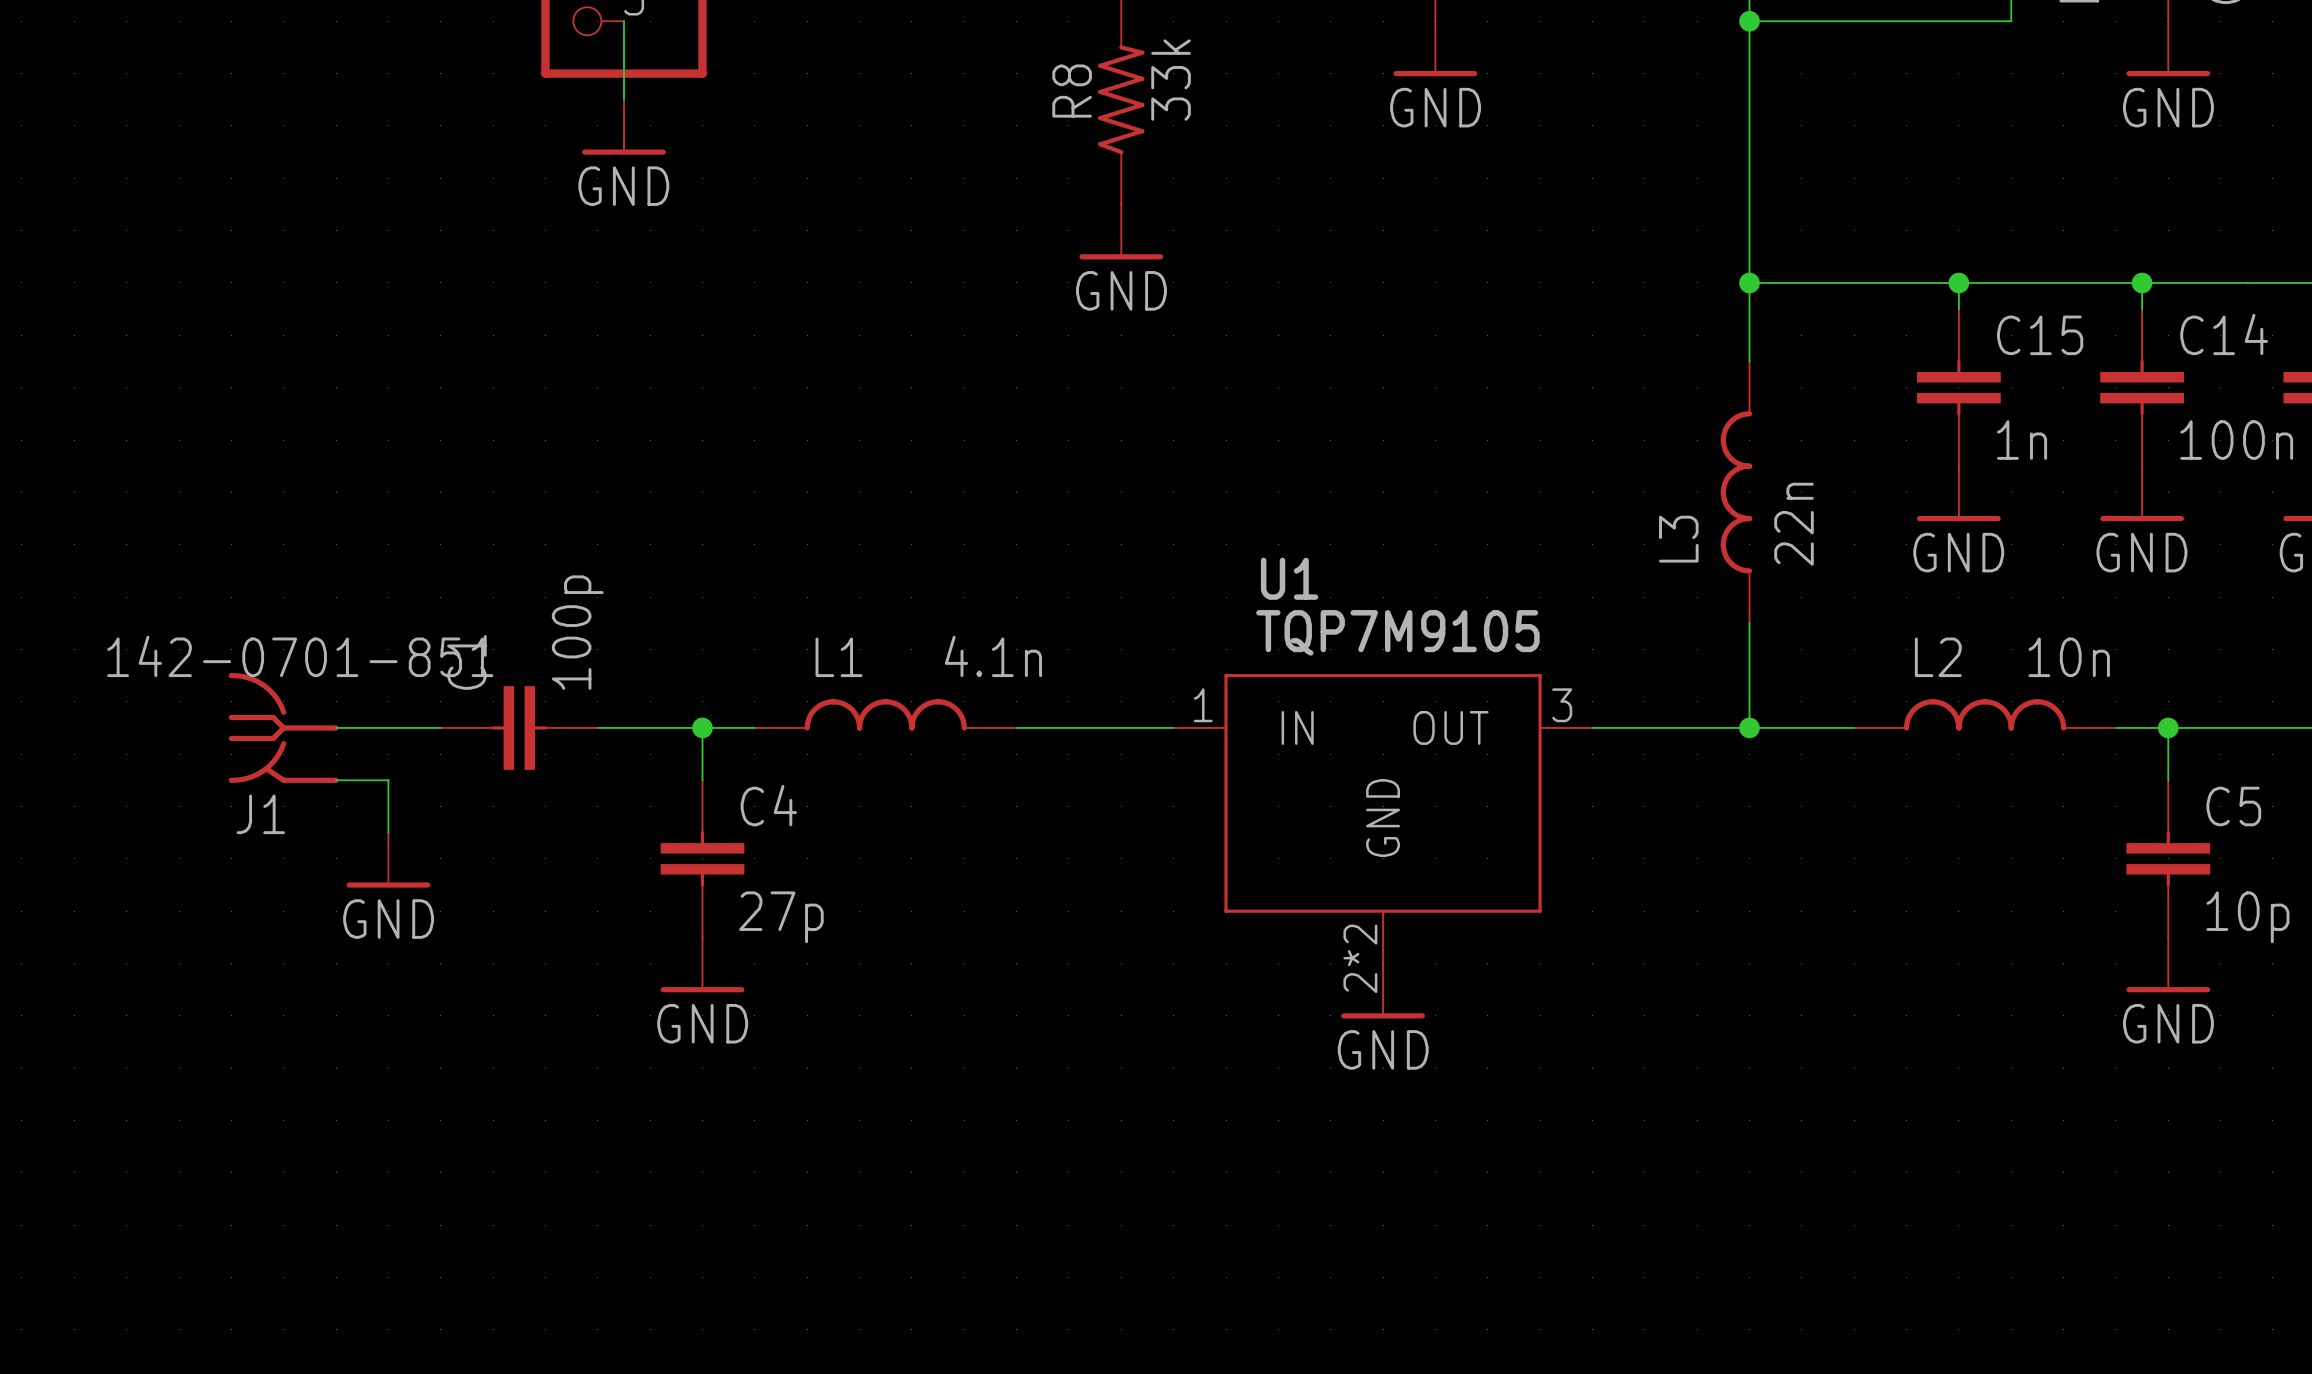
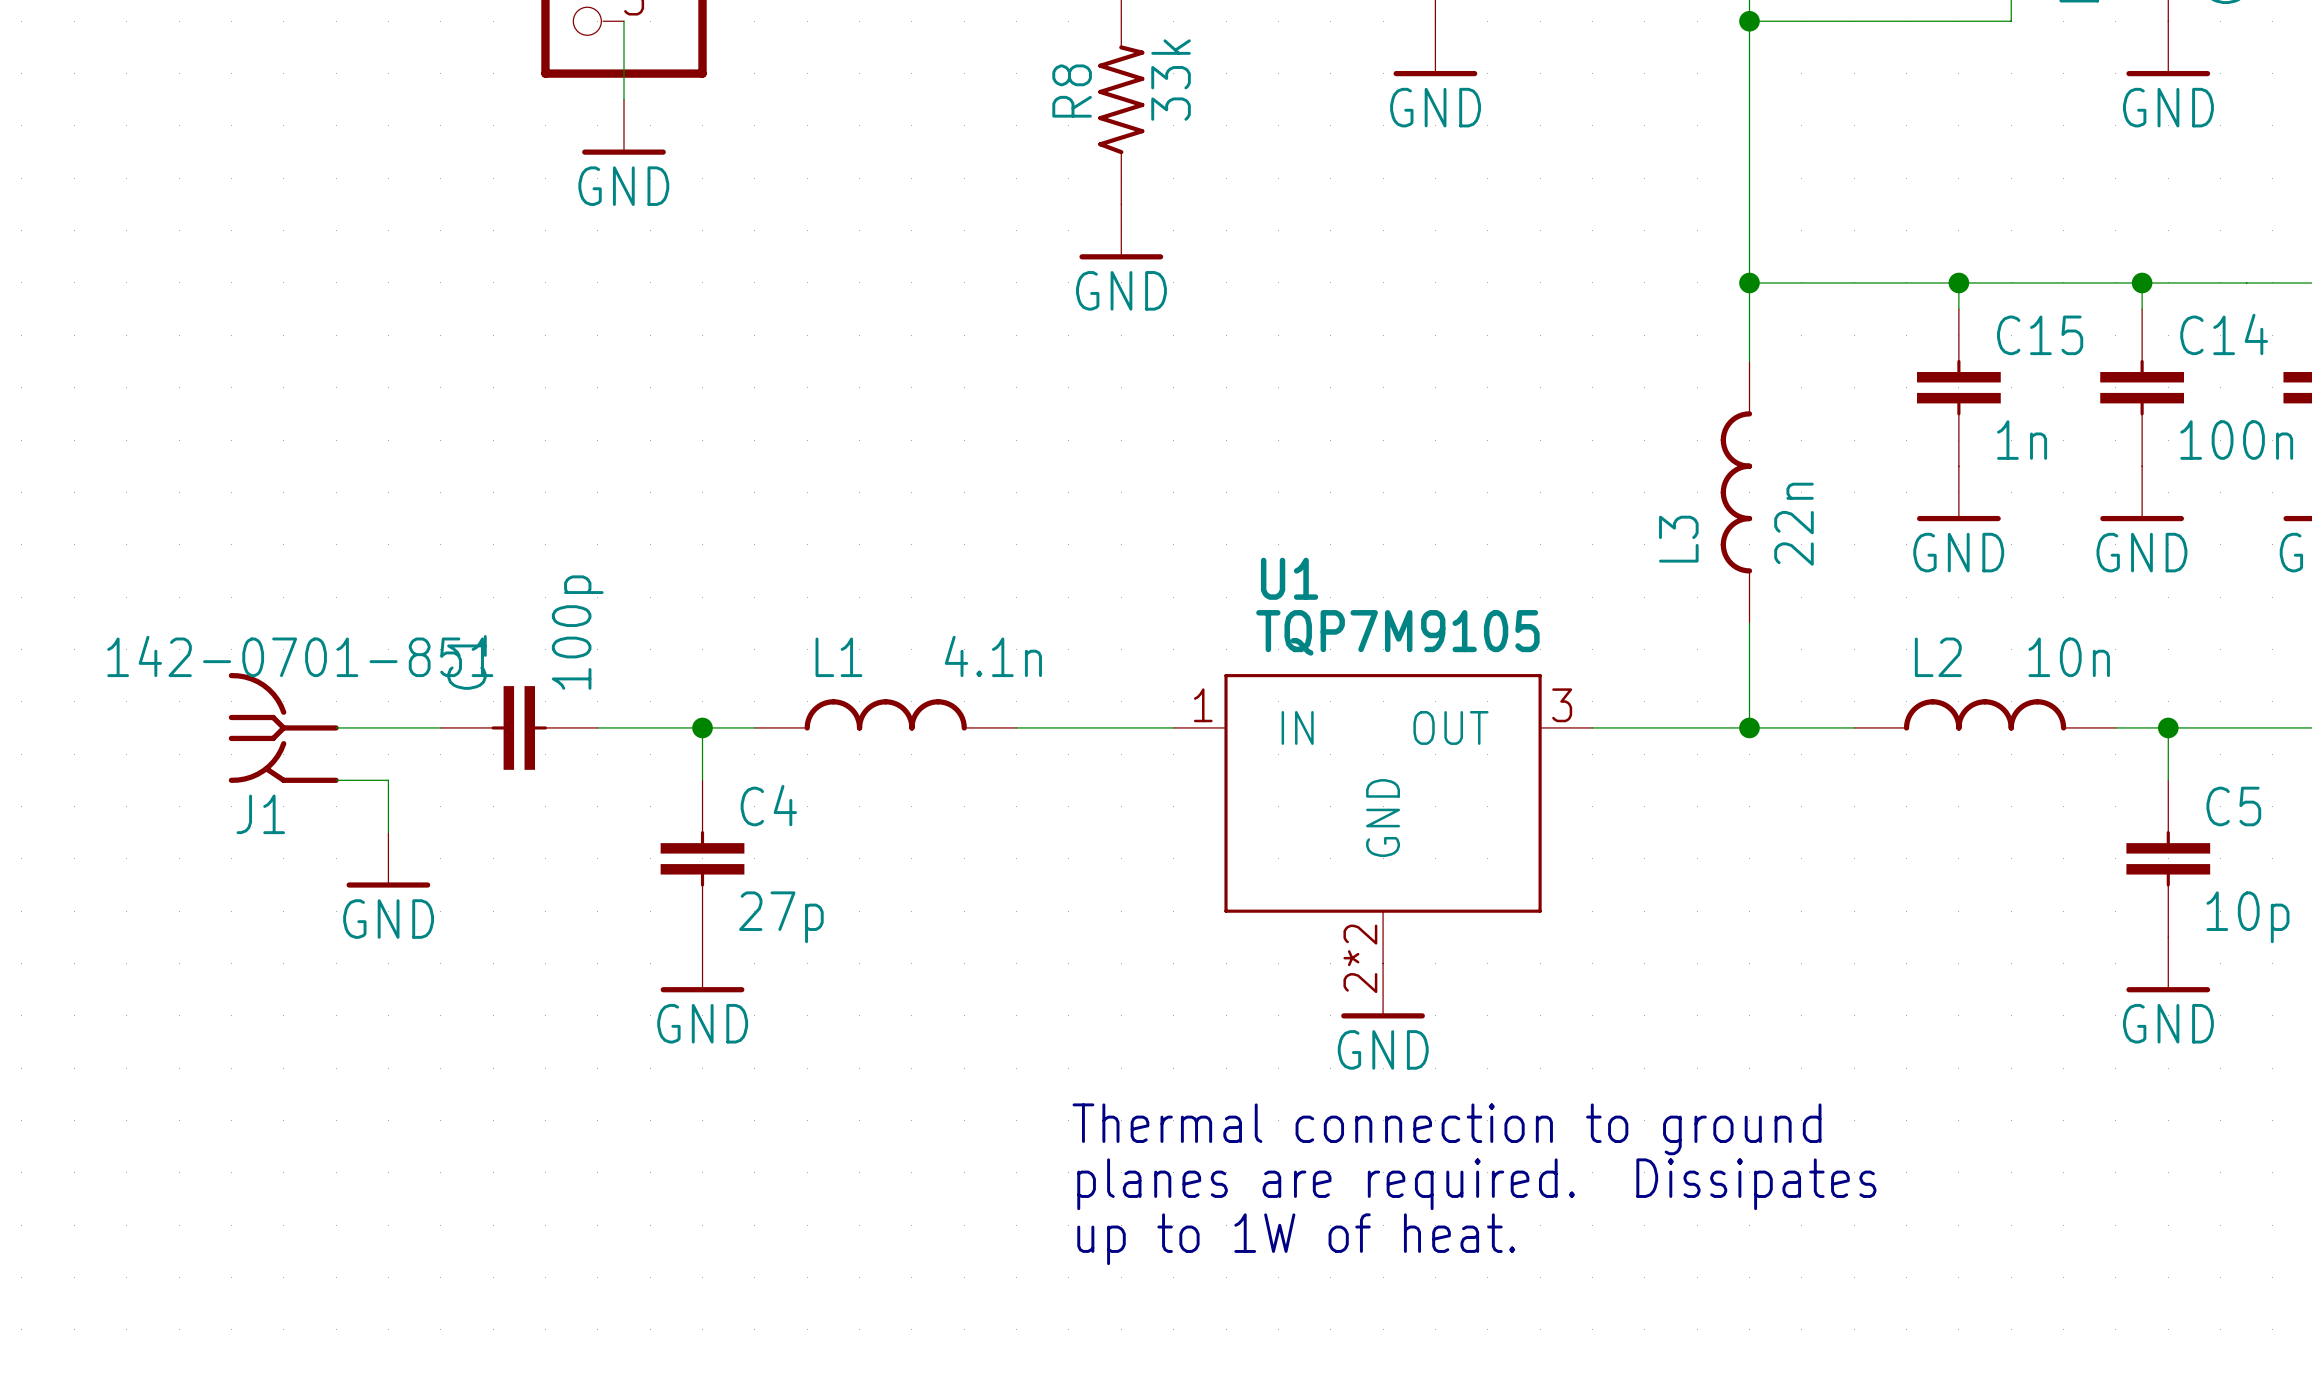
text: none -> Thermal connection to ground (1447, 1129)
text: none -> planes are required. Dissipates (1476, 1184)
text: none -> up to 1W of heat. (1296, 1239)

